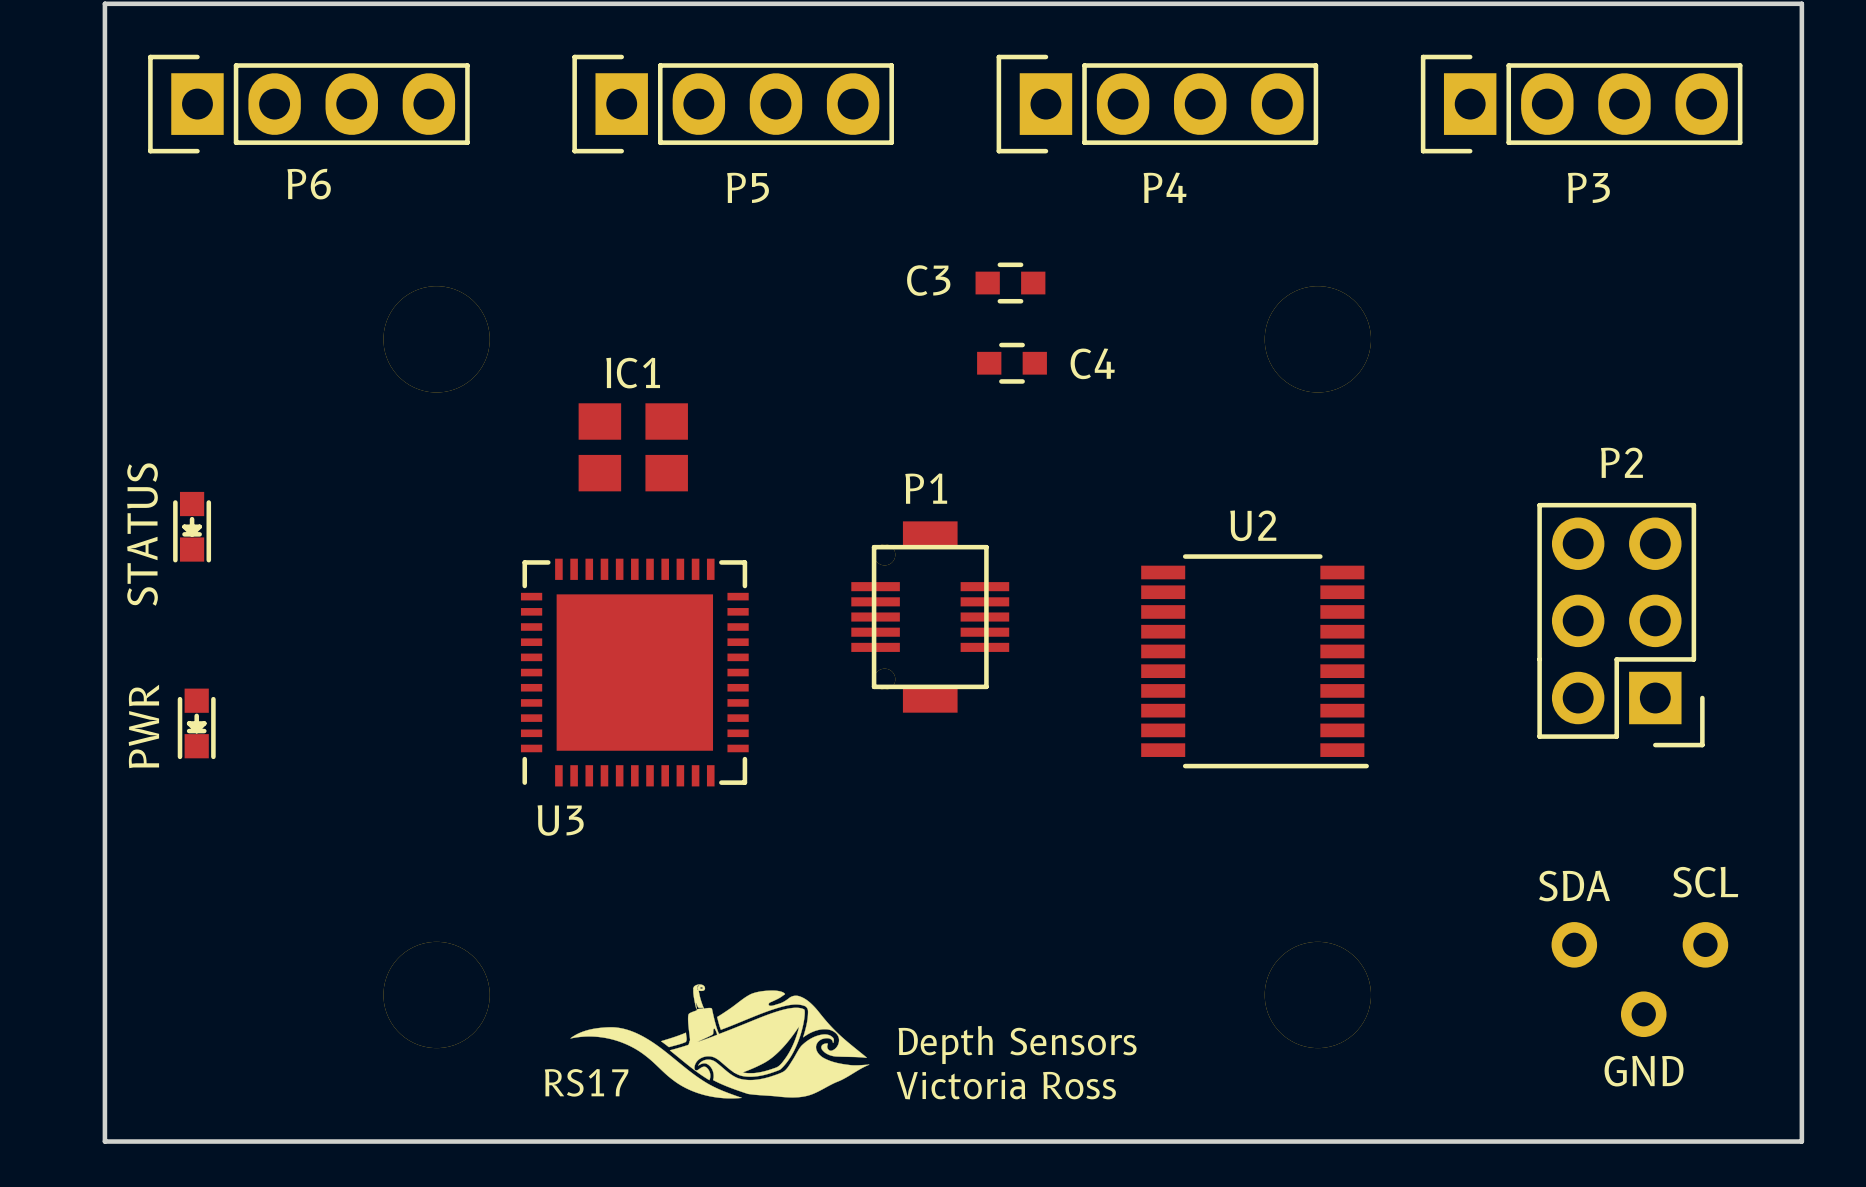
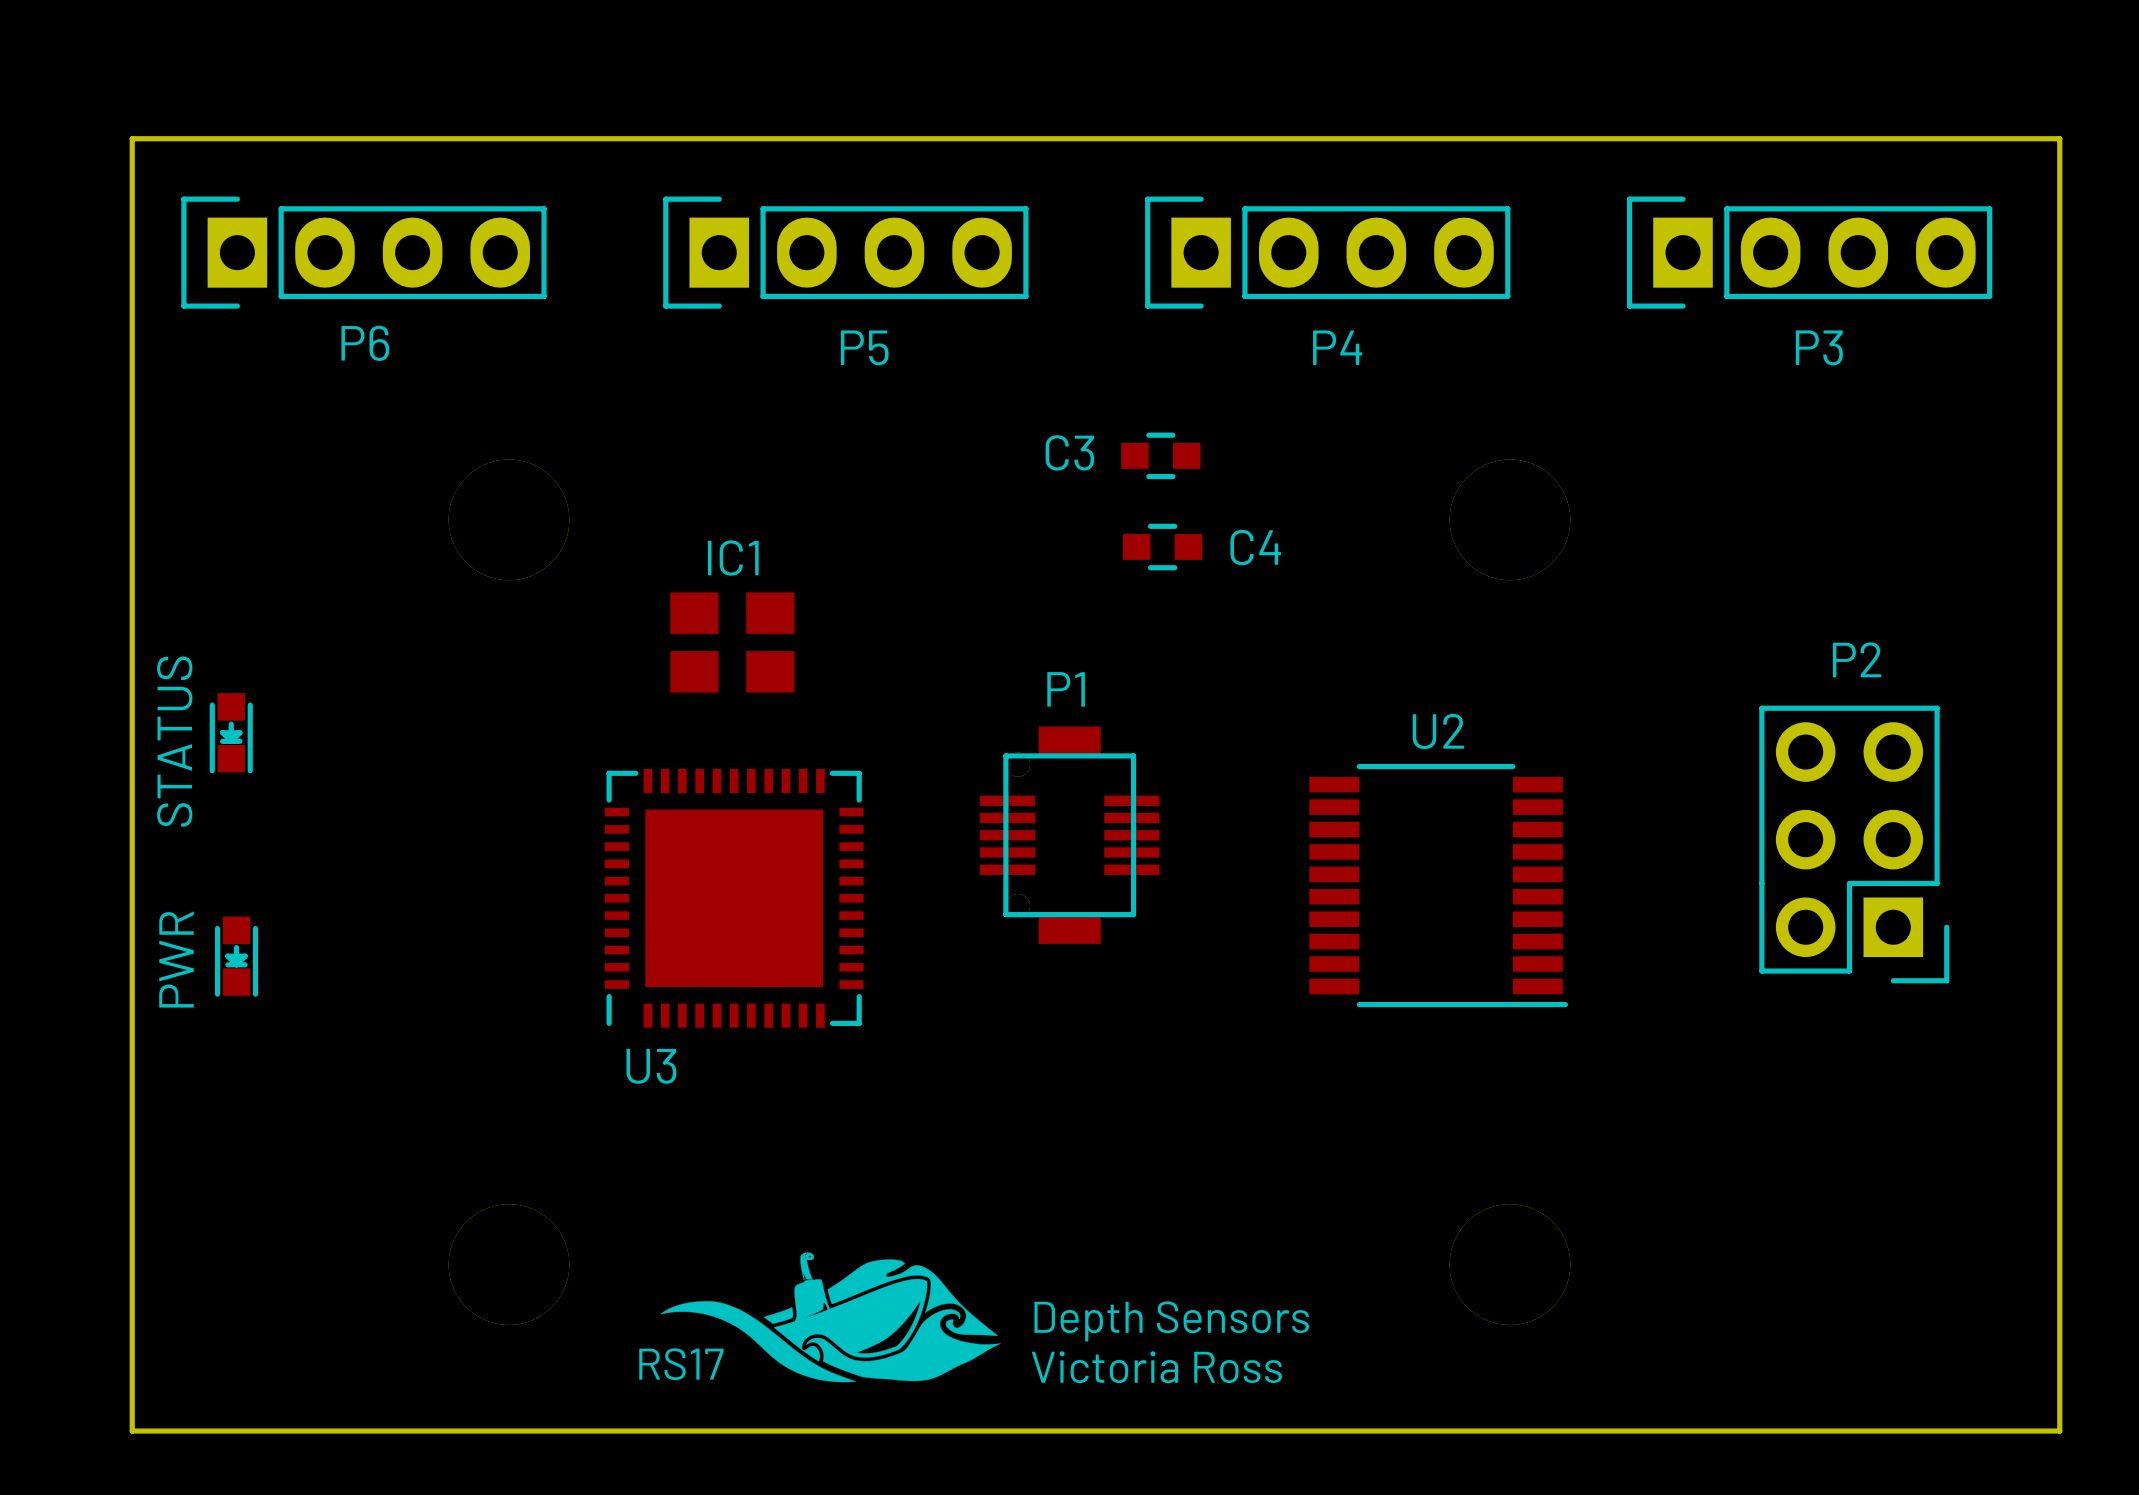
text: SCL (1705, 882) -> none
text: SDA (1574, 886) -> none
part: (1574, 944) -> none
part: (1705, 944) -> none
part: (1643, 1014) -> none
text: GND (1644, 1071) -> none

